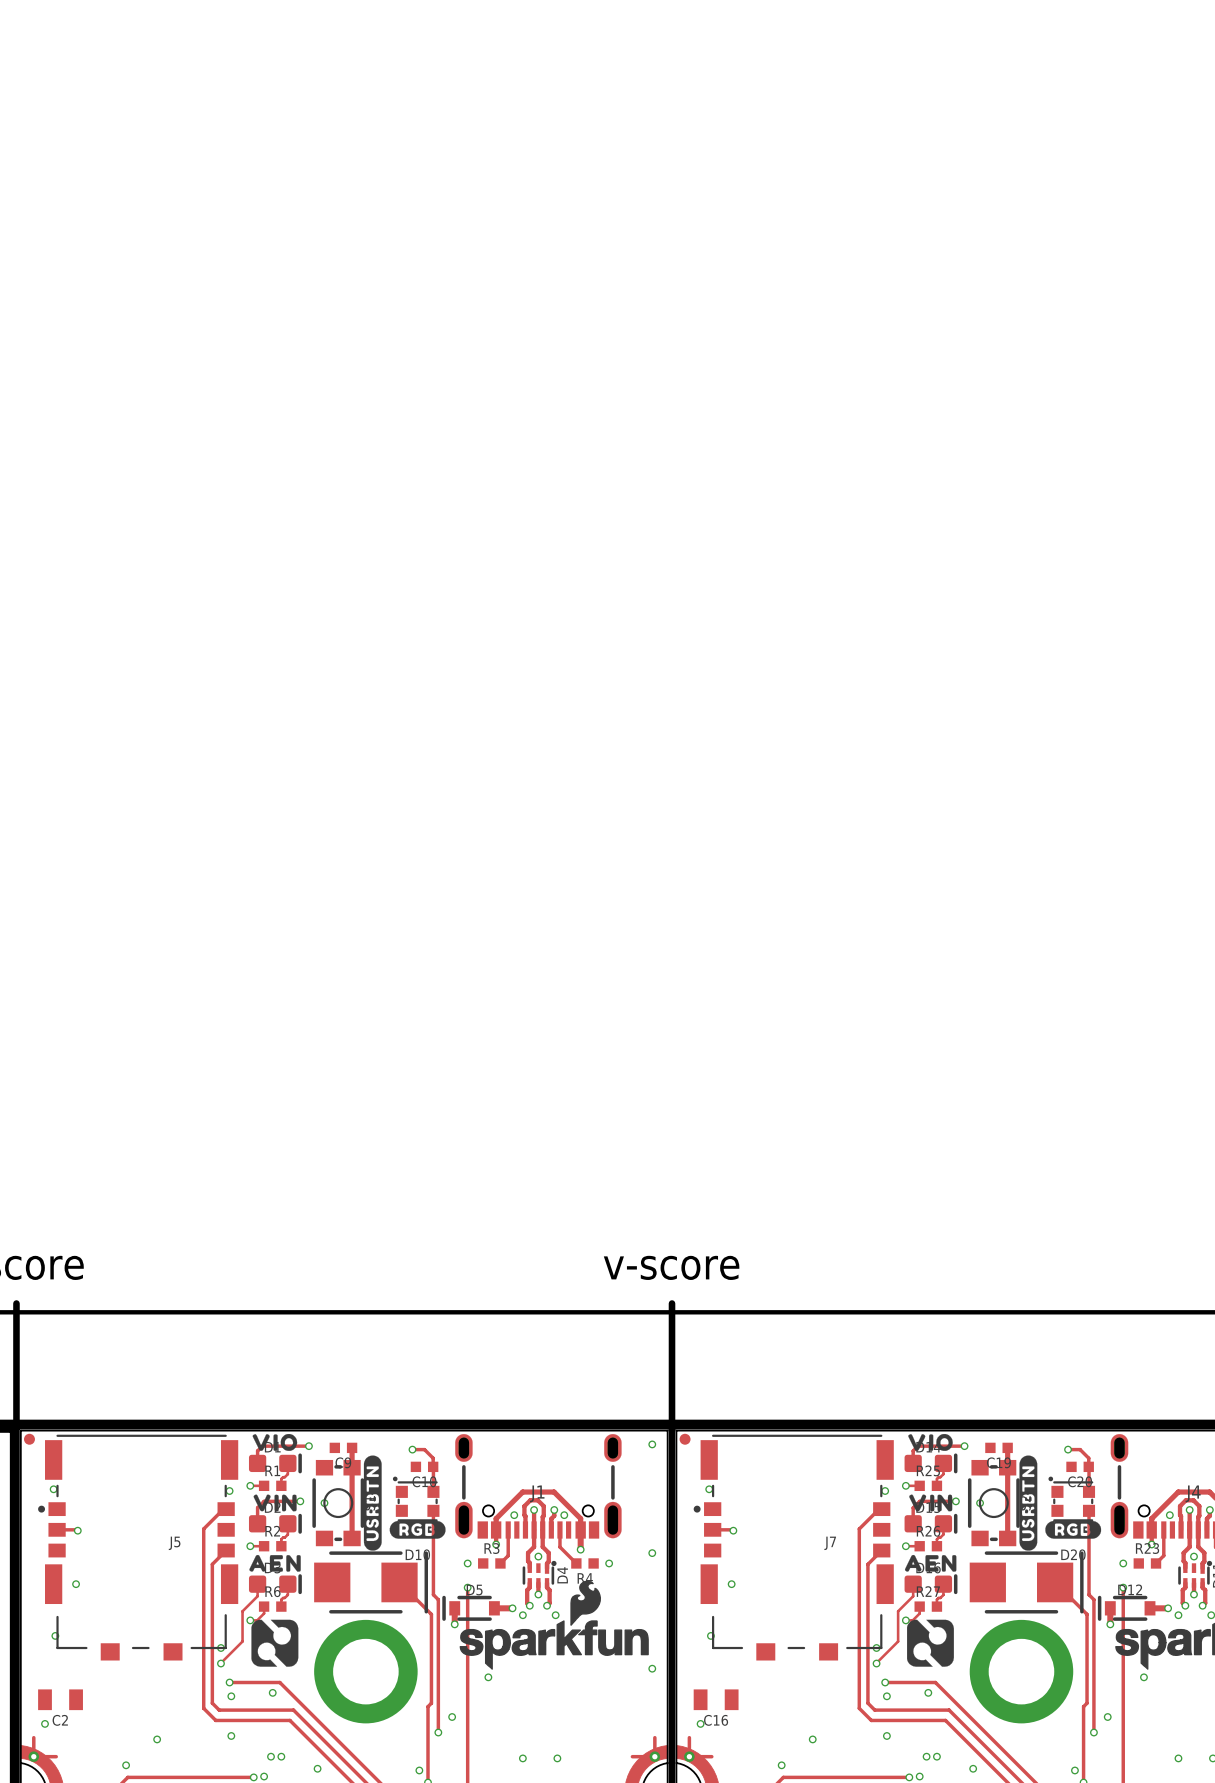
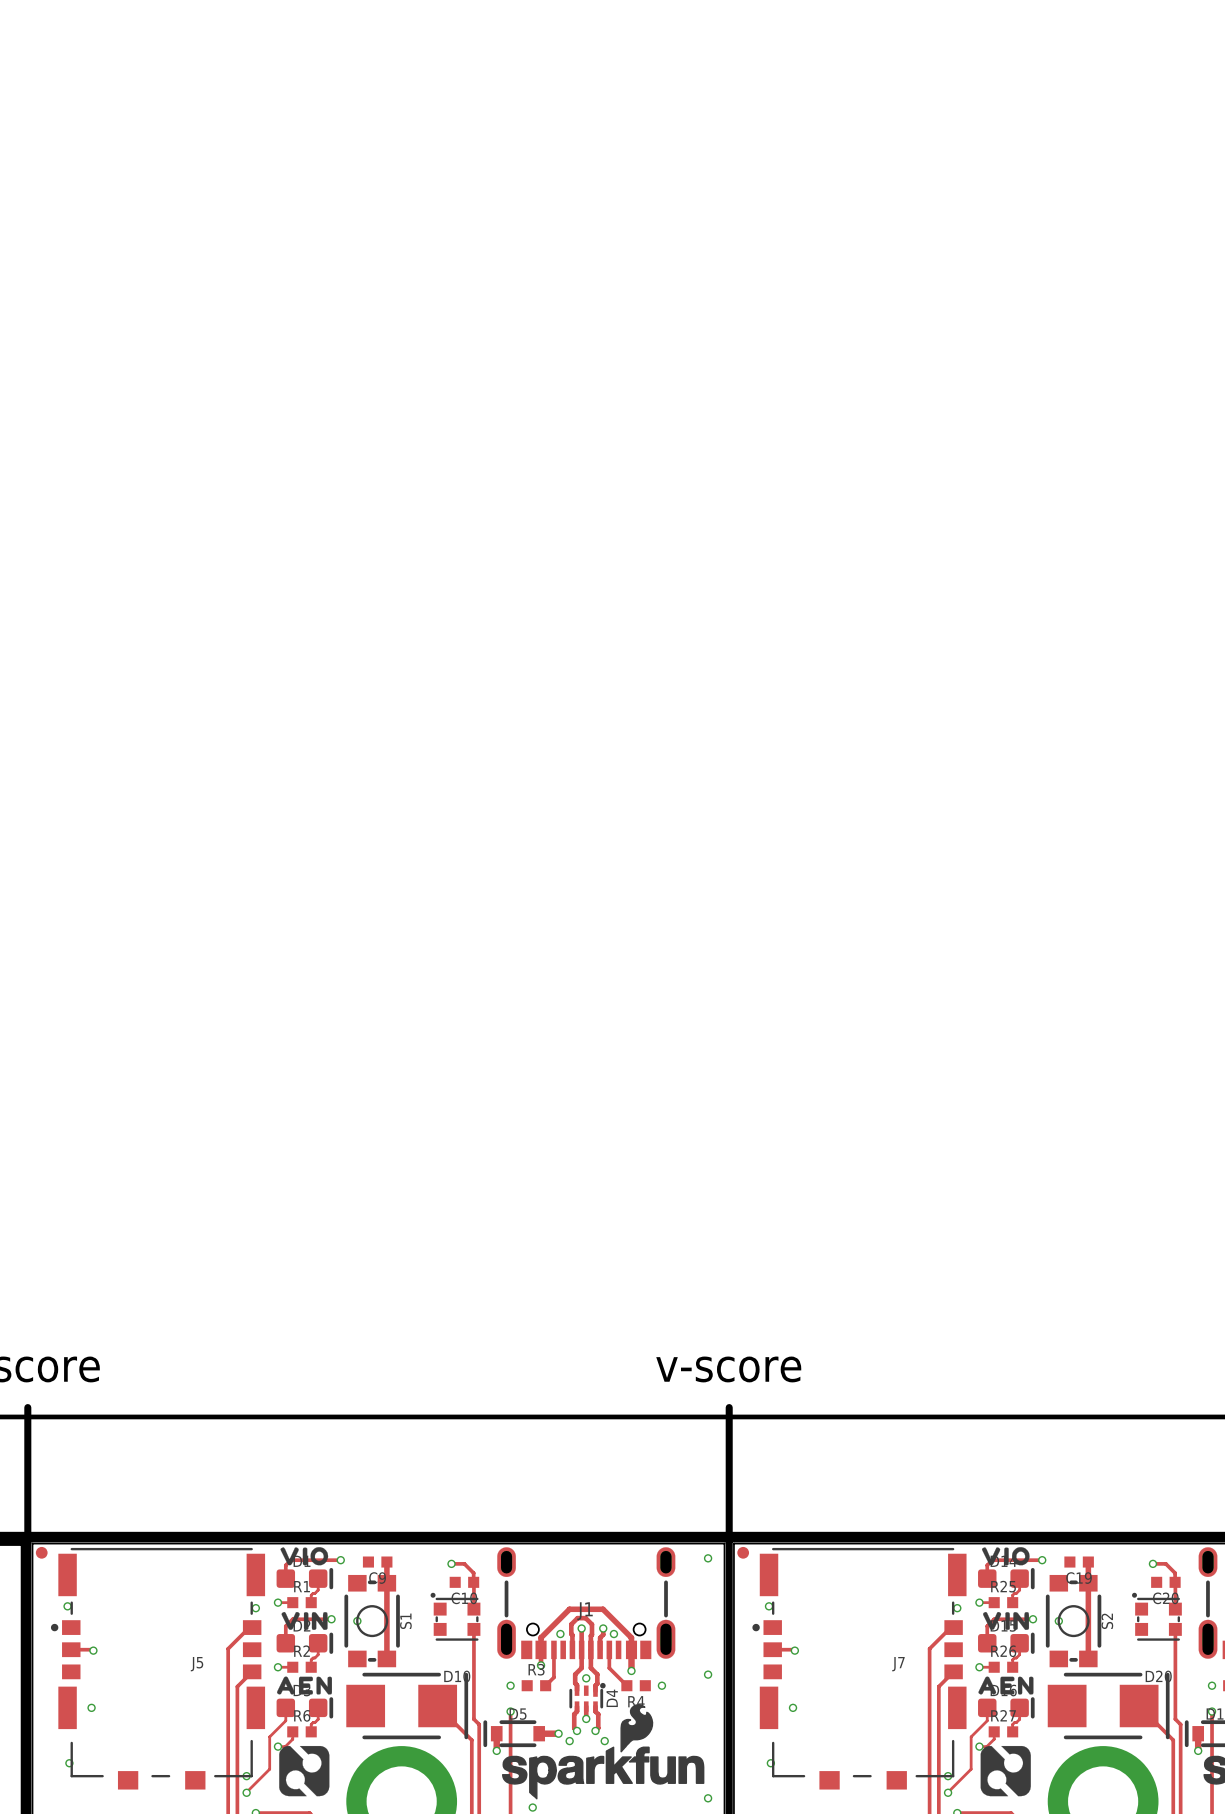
drawing: [363, 1455, 446, 1551] -> none
drawing: [1019, 1455, 1102, 1551] -> none

